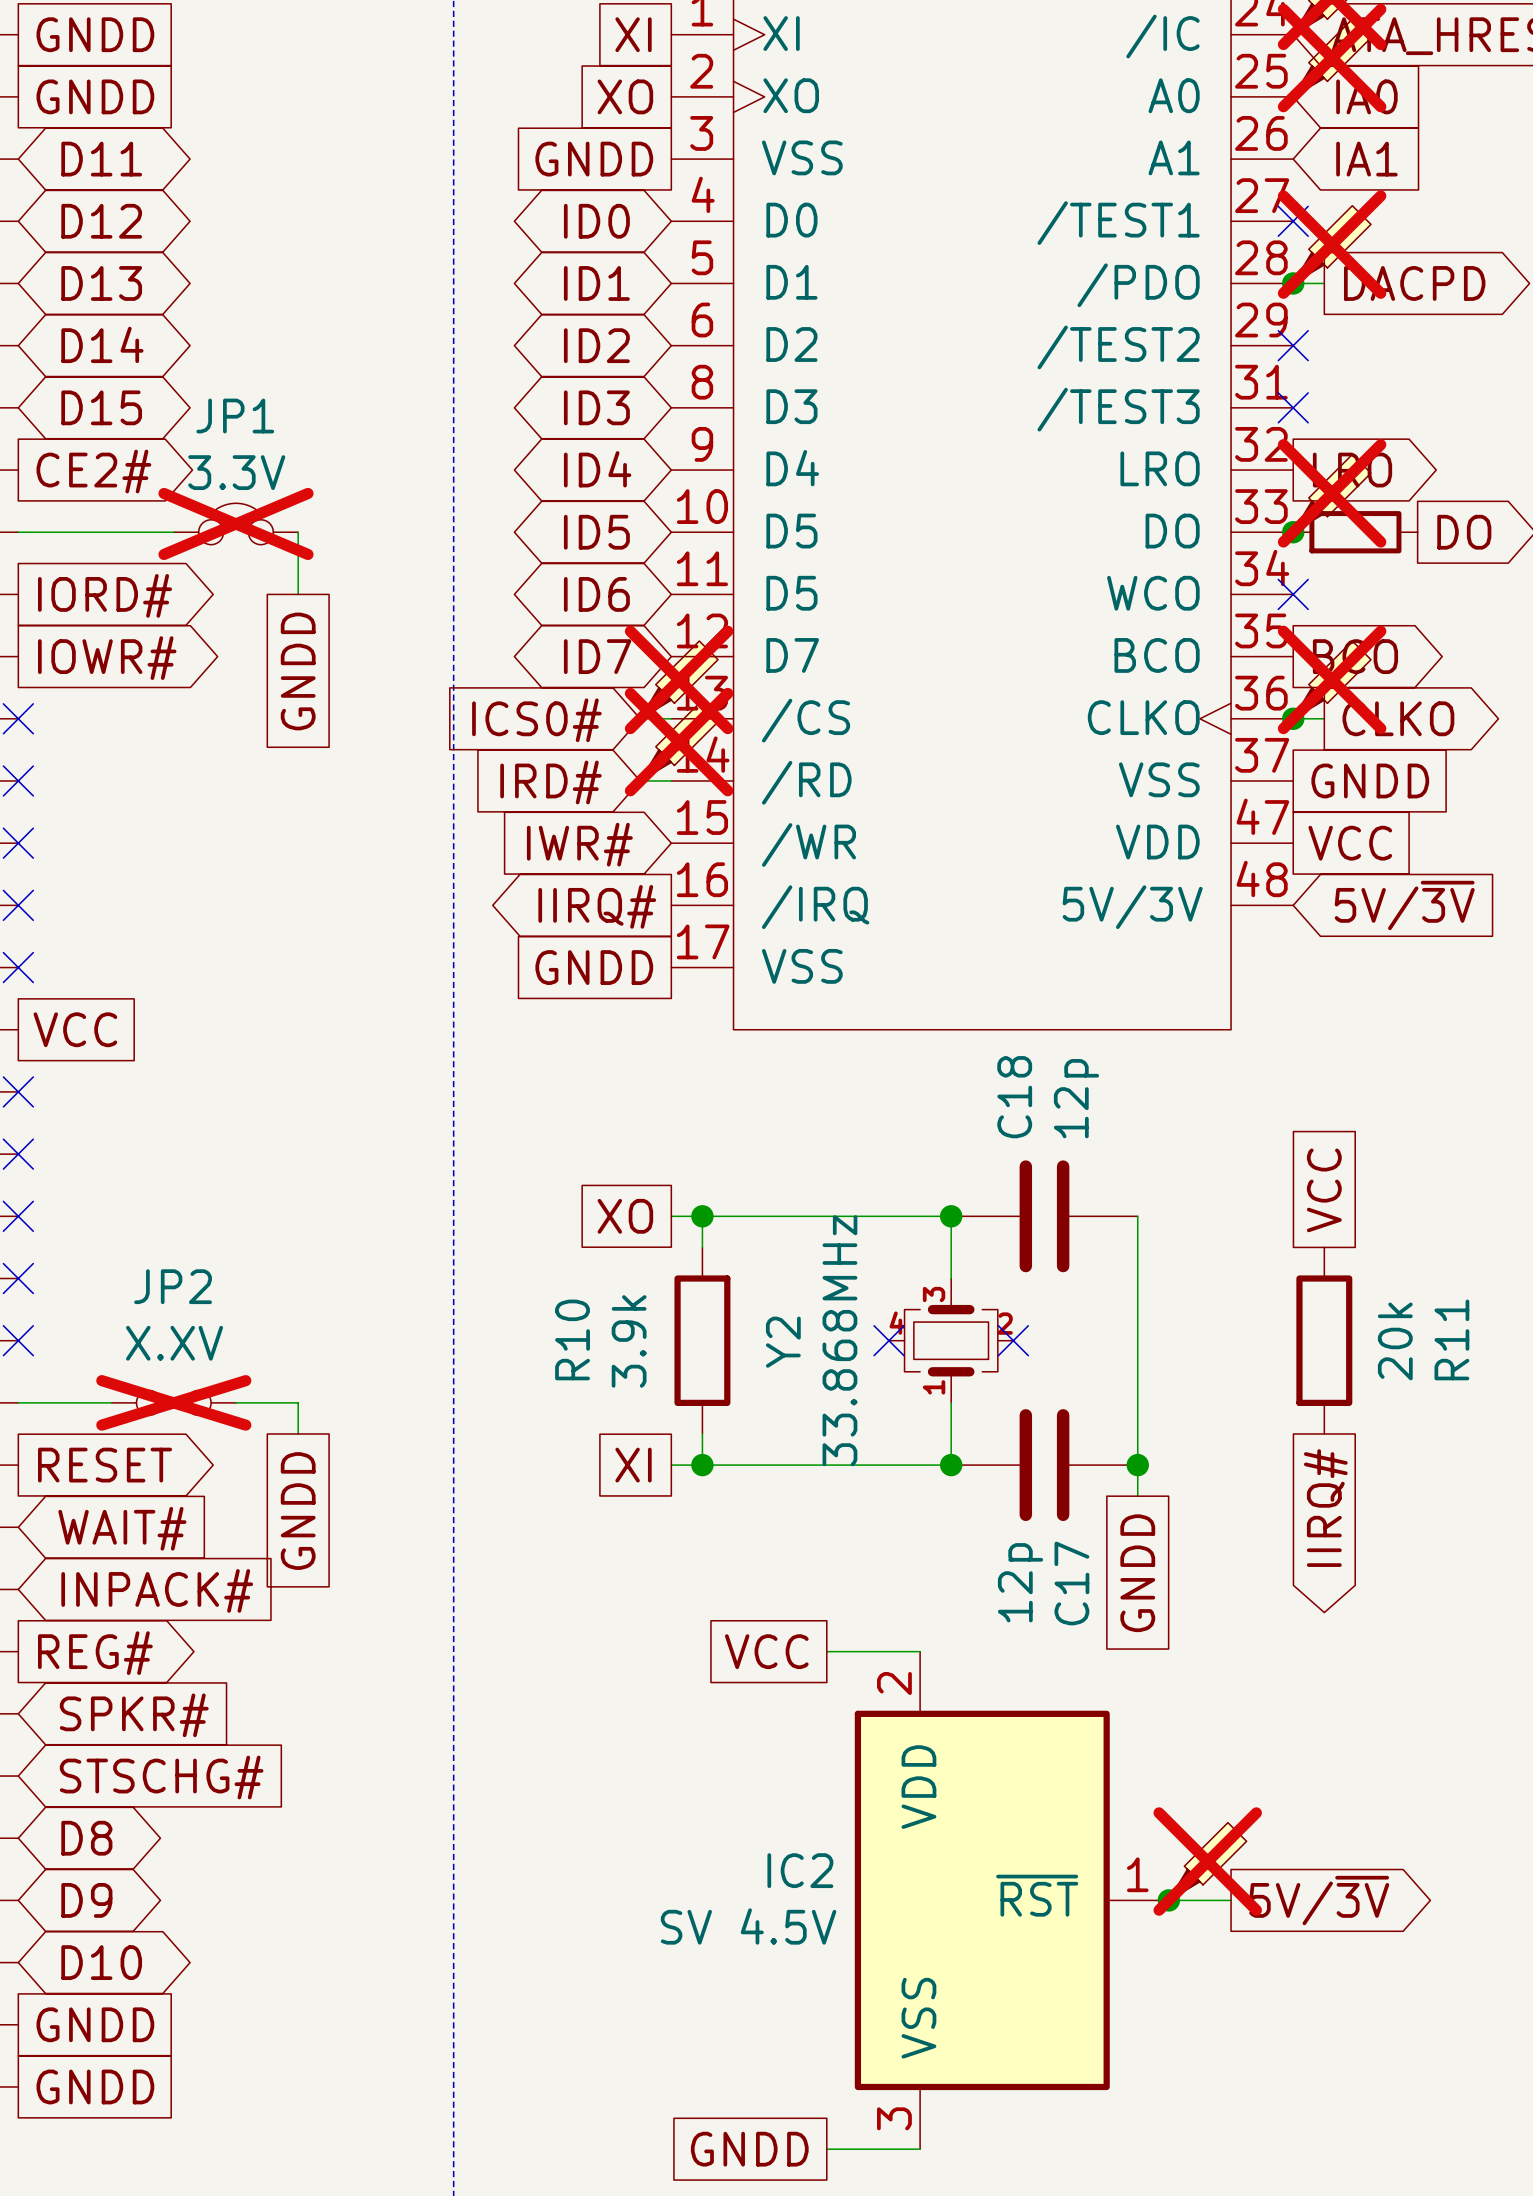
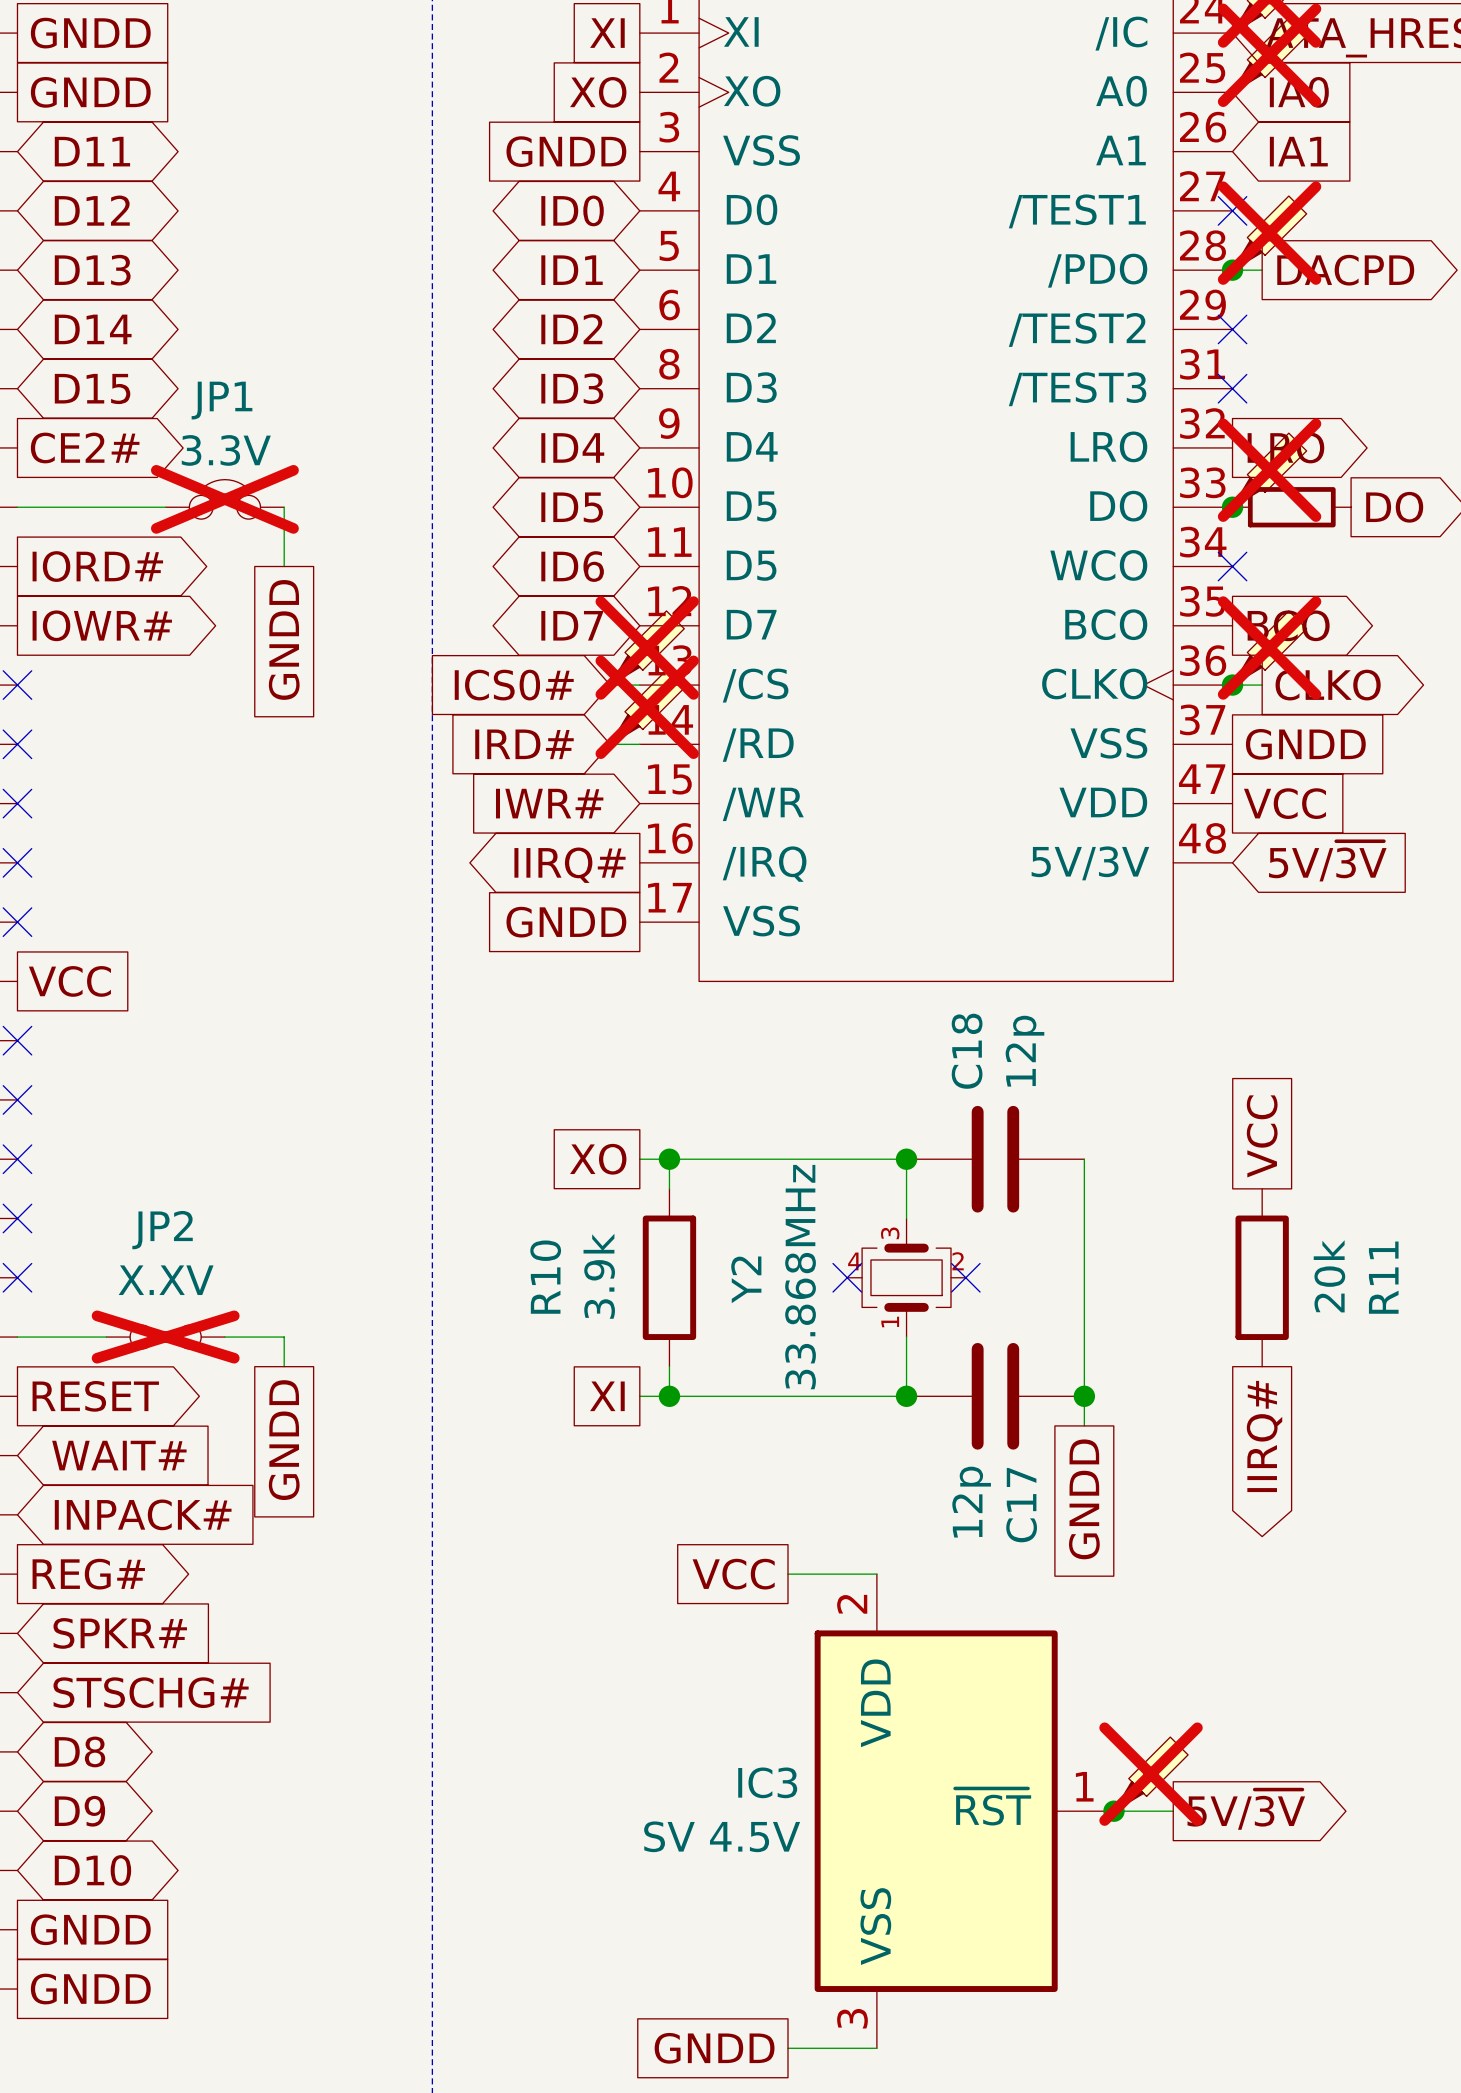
IC2 name: IC2 (800, 1870) -> IC3 (767, 1782)

